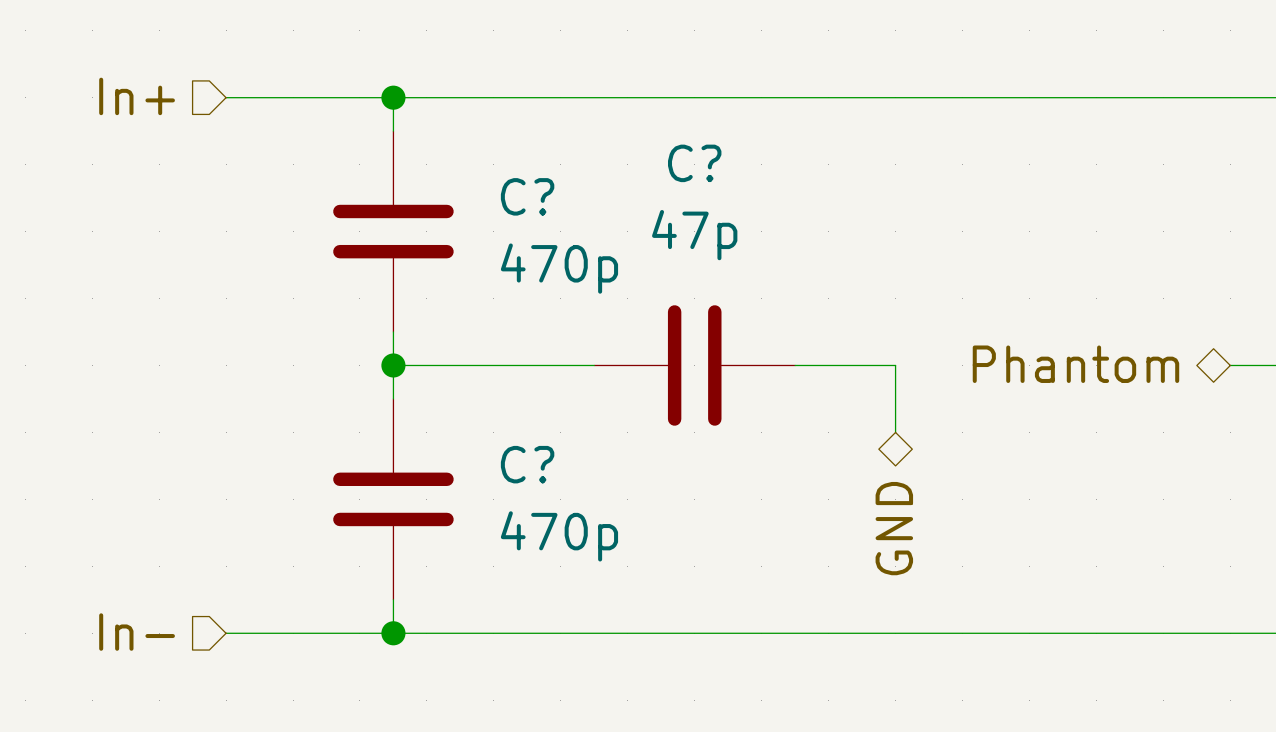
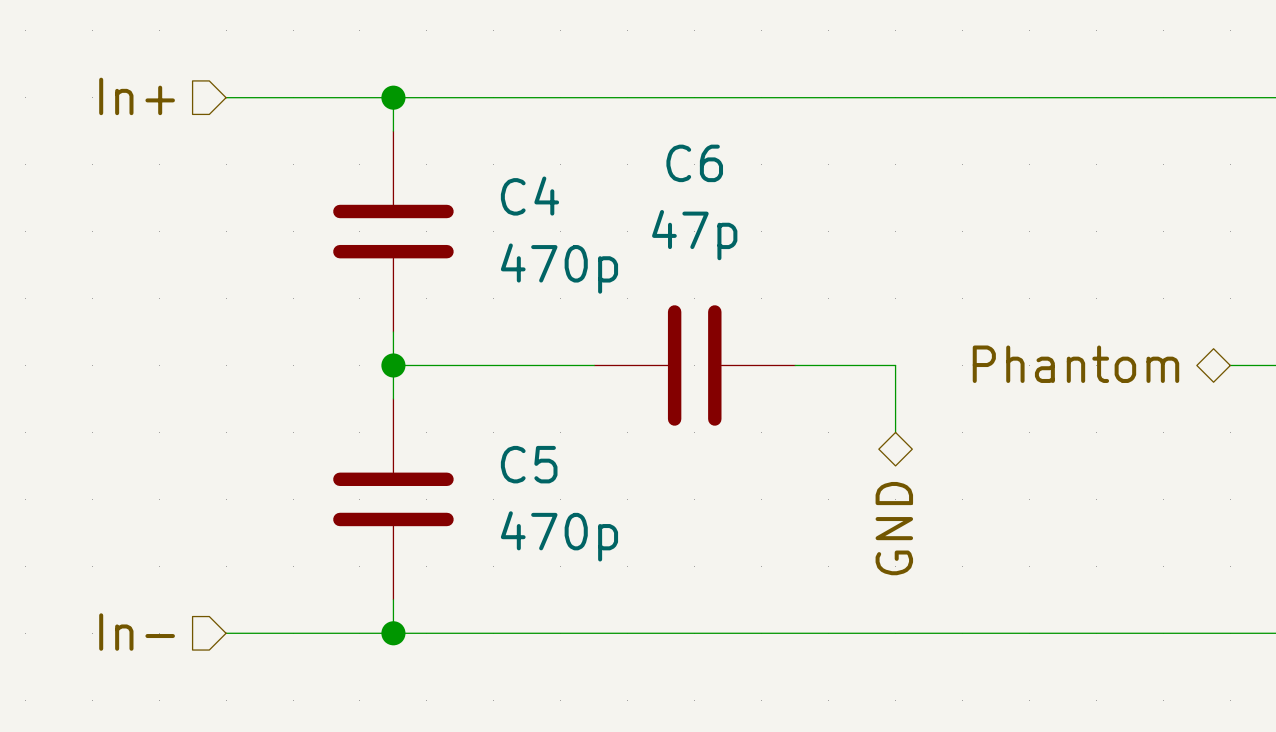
C? name: C? (694, 163) -> C6 (694, 163)
C? name: C? (527, 196) -> C4 (529, 196)
C? name: C? (527, 464) -> C5 (529, 464)

